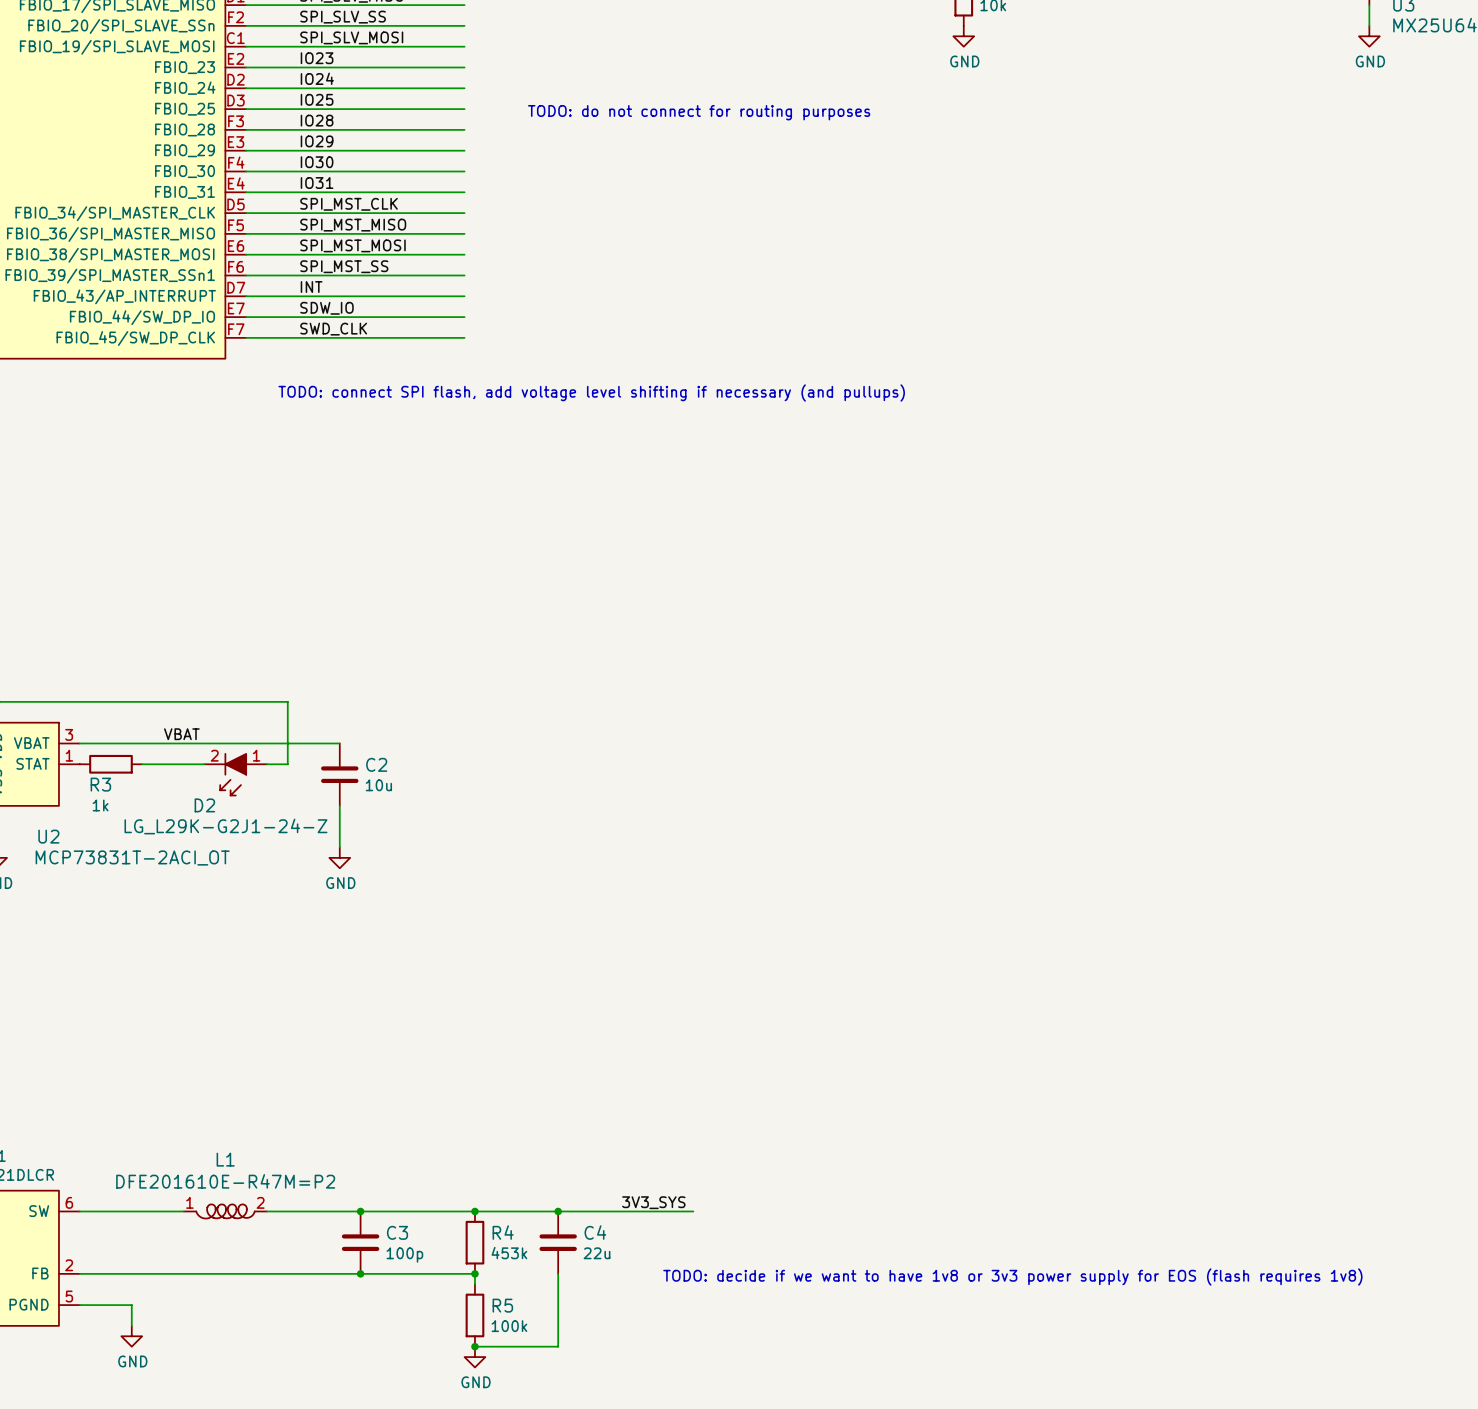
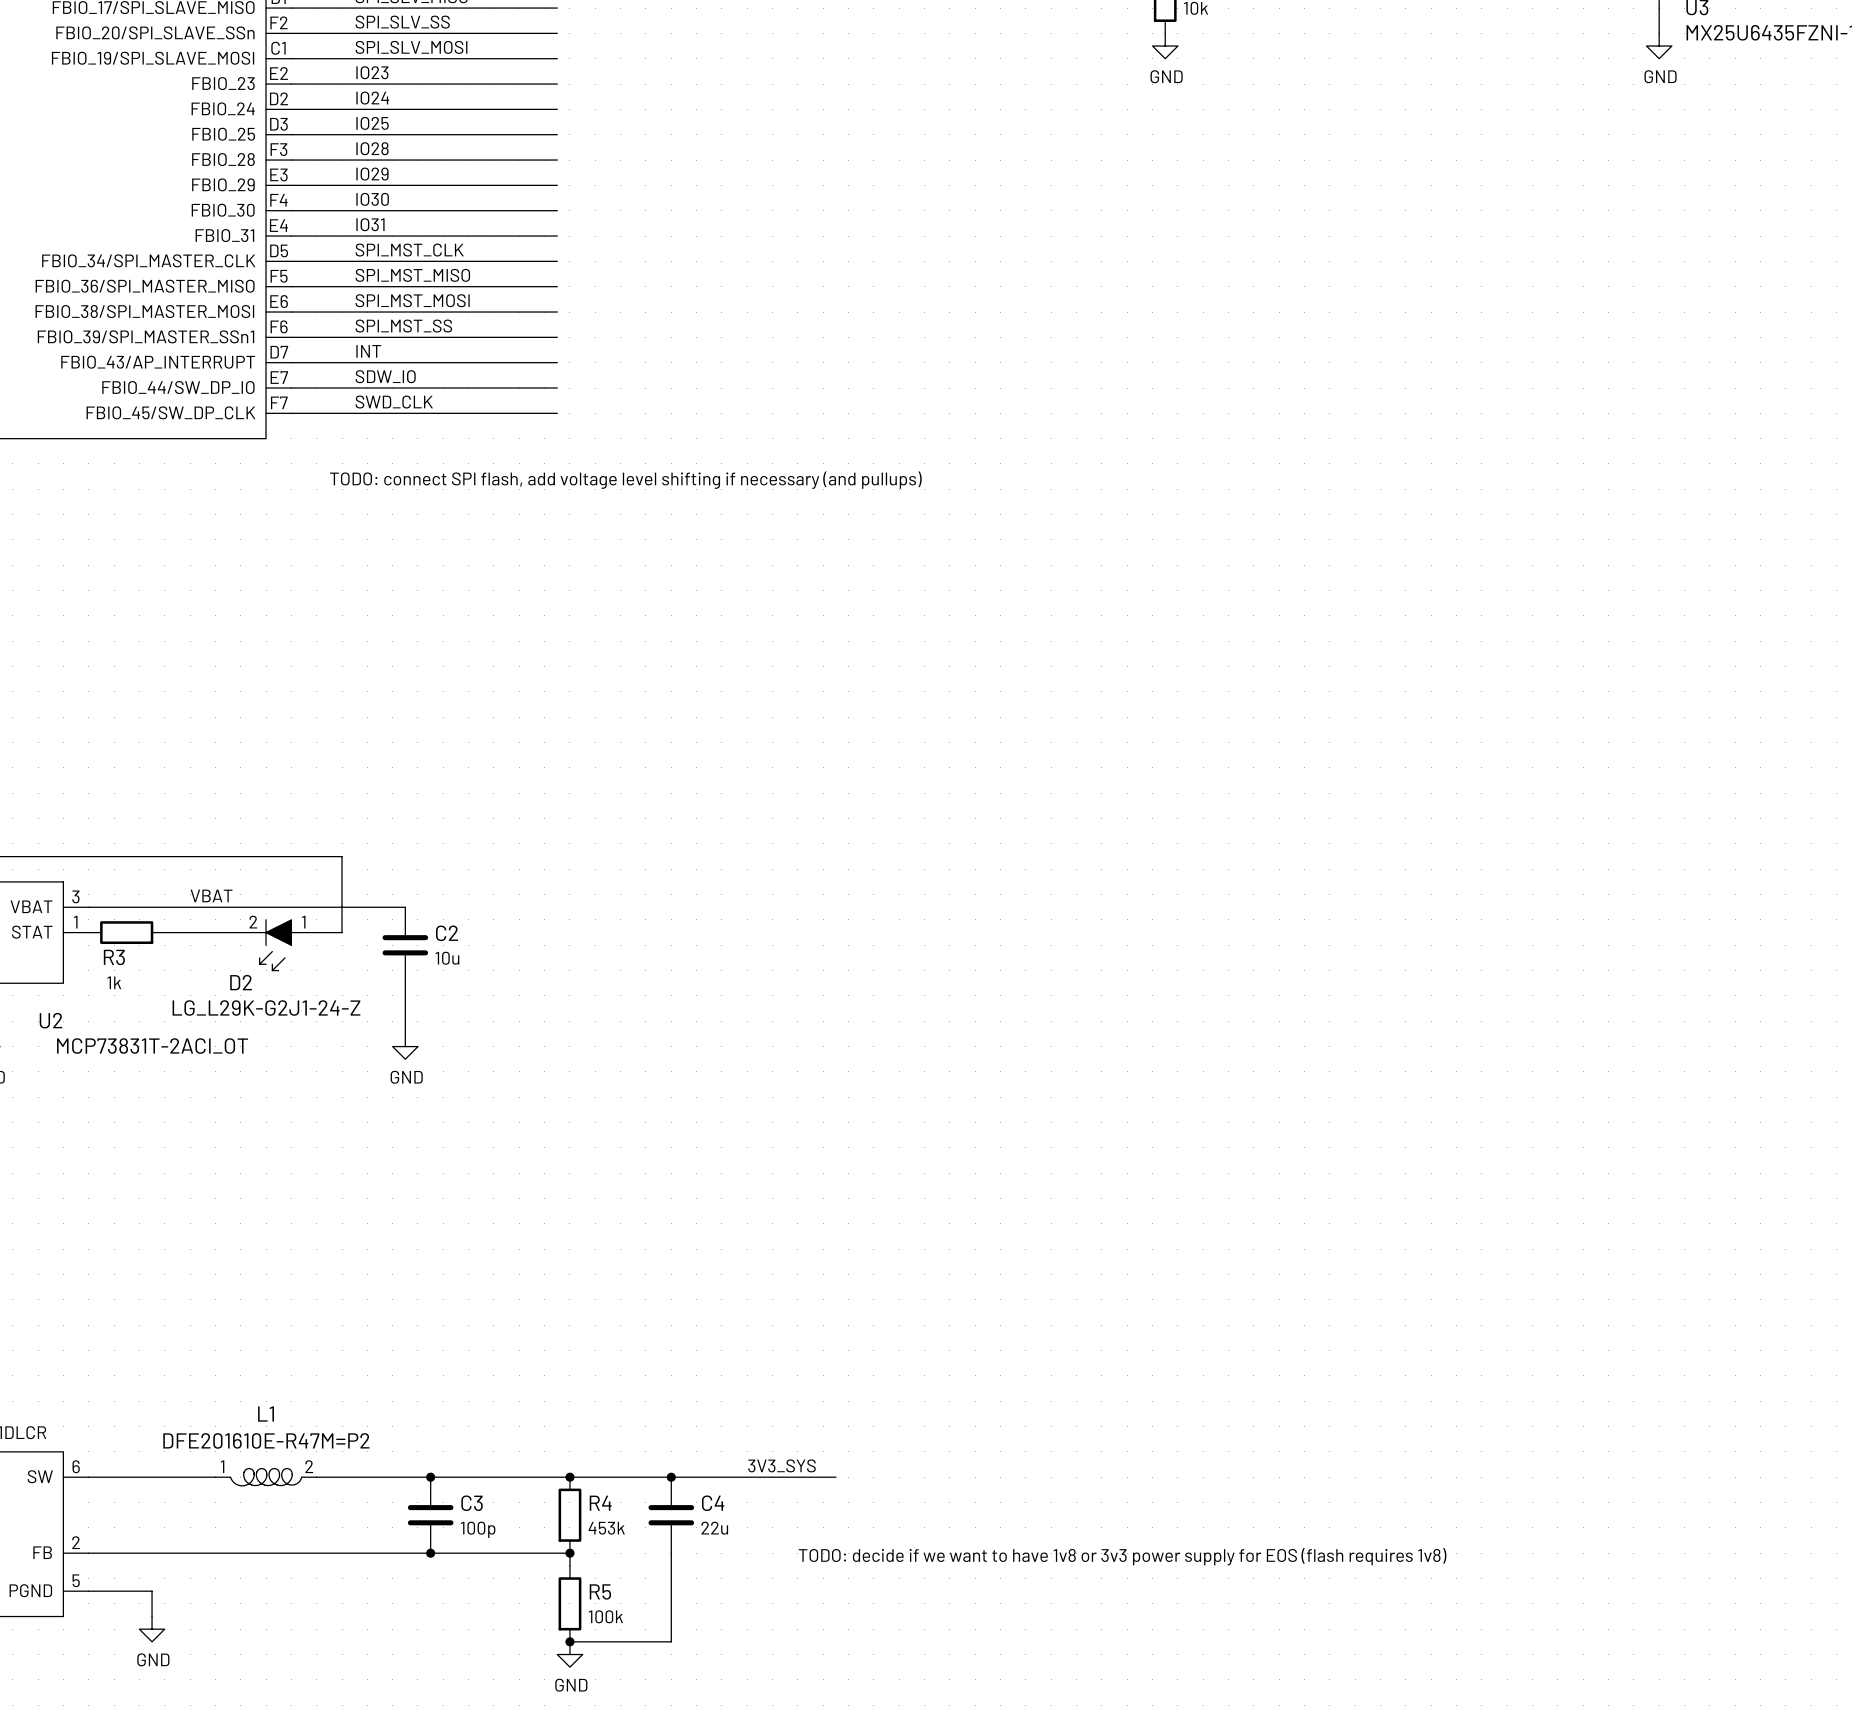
text: TODO: do not connect for routing purposes (699, 112) -> none

